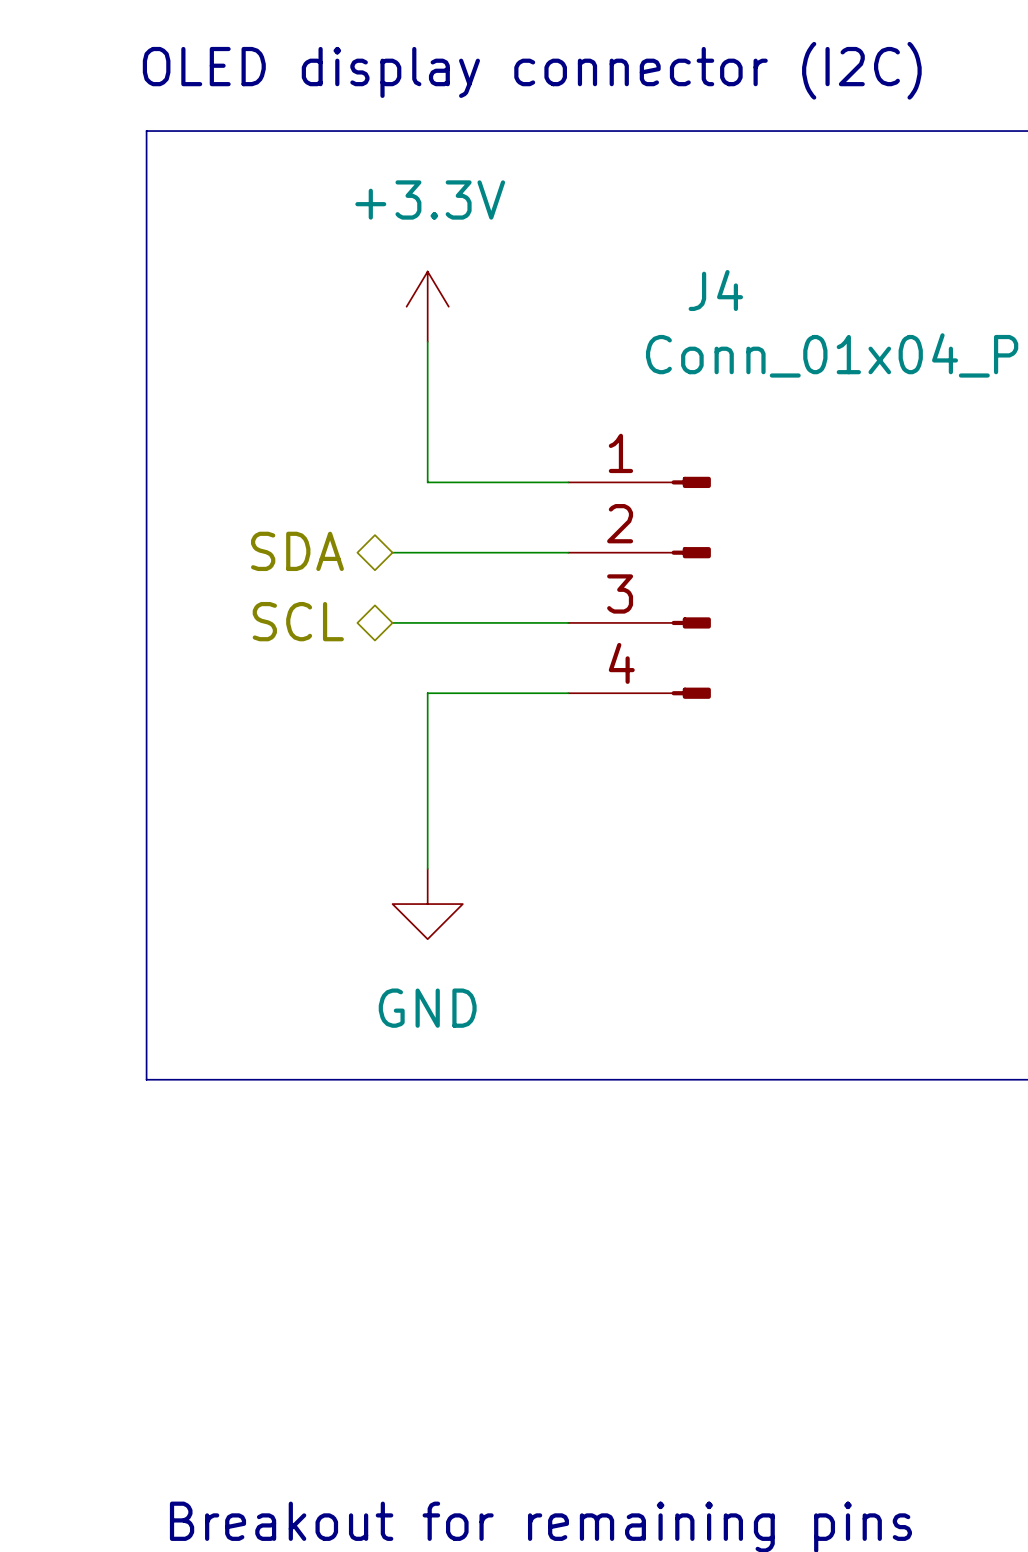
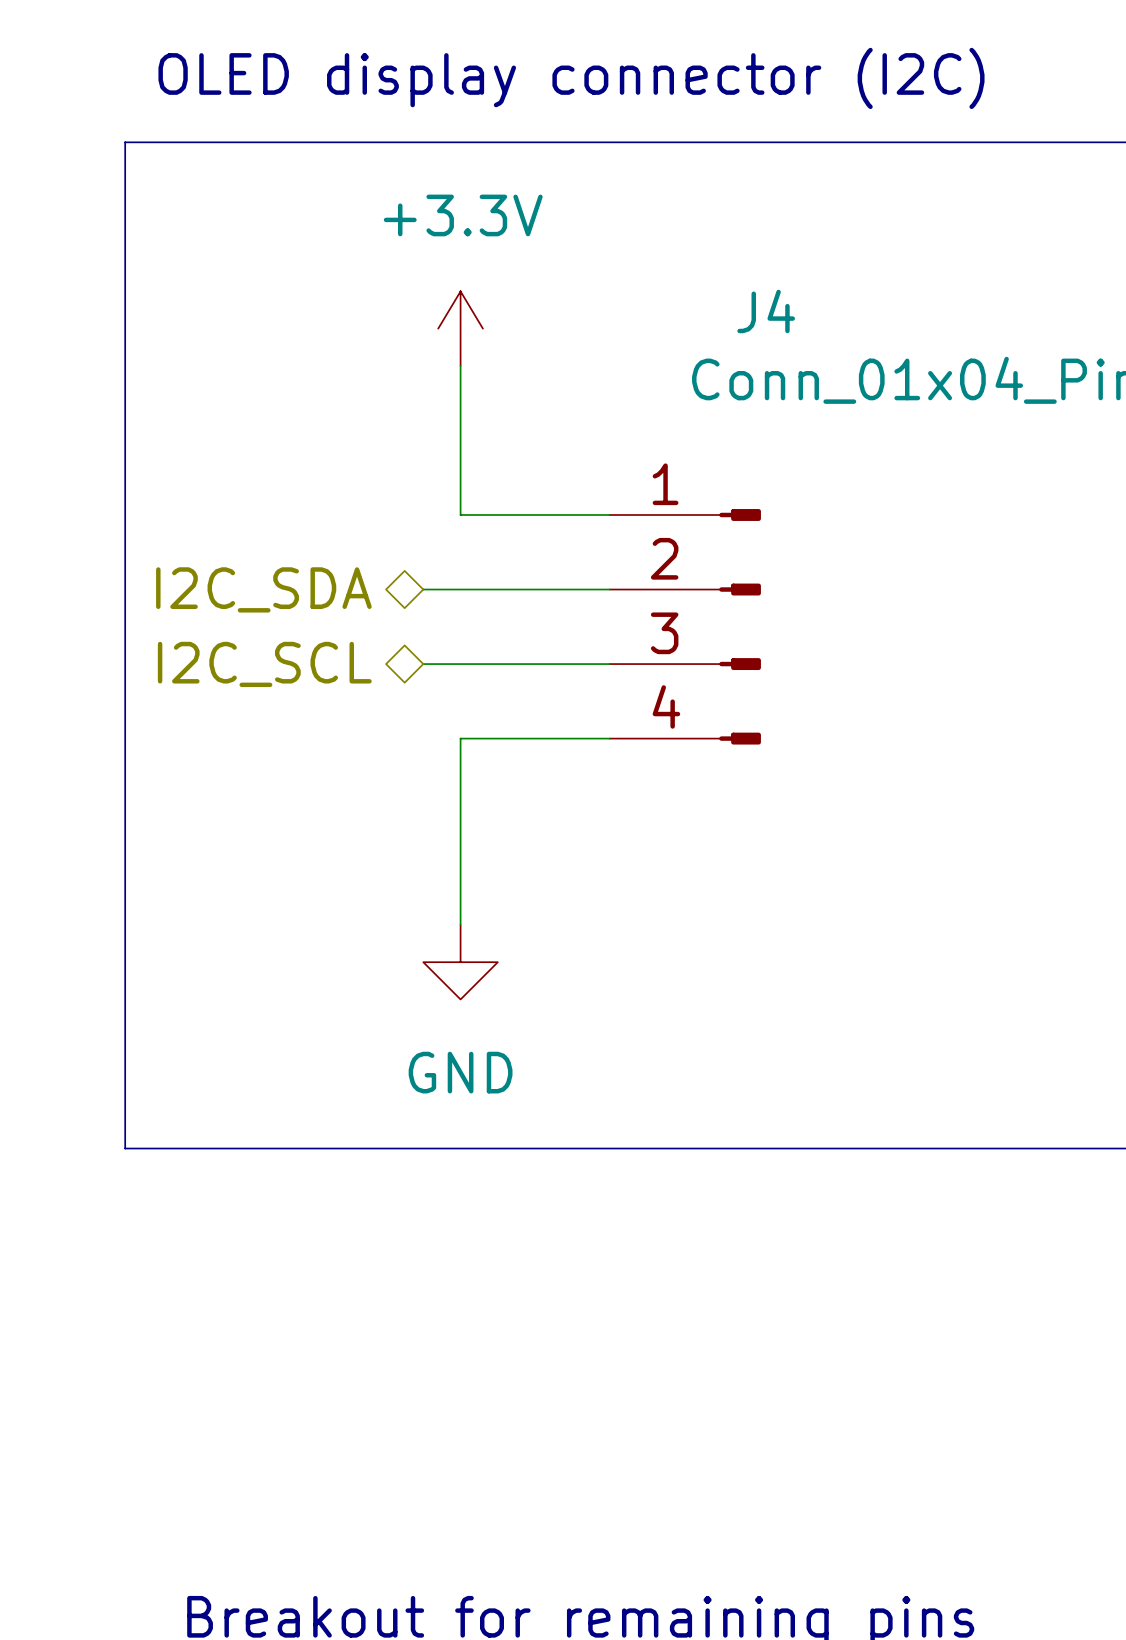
line: (146, 131) (146, 1079) -> (162, 142) (125, 142) (125, 1148) (162, 1148)
hierarchical label: SDA (297, 551) -> I2C_SDA (263, 589)
hierarchical label: SCL (298, 621) -> I2C_SCL (264, 664)

